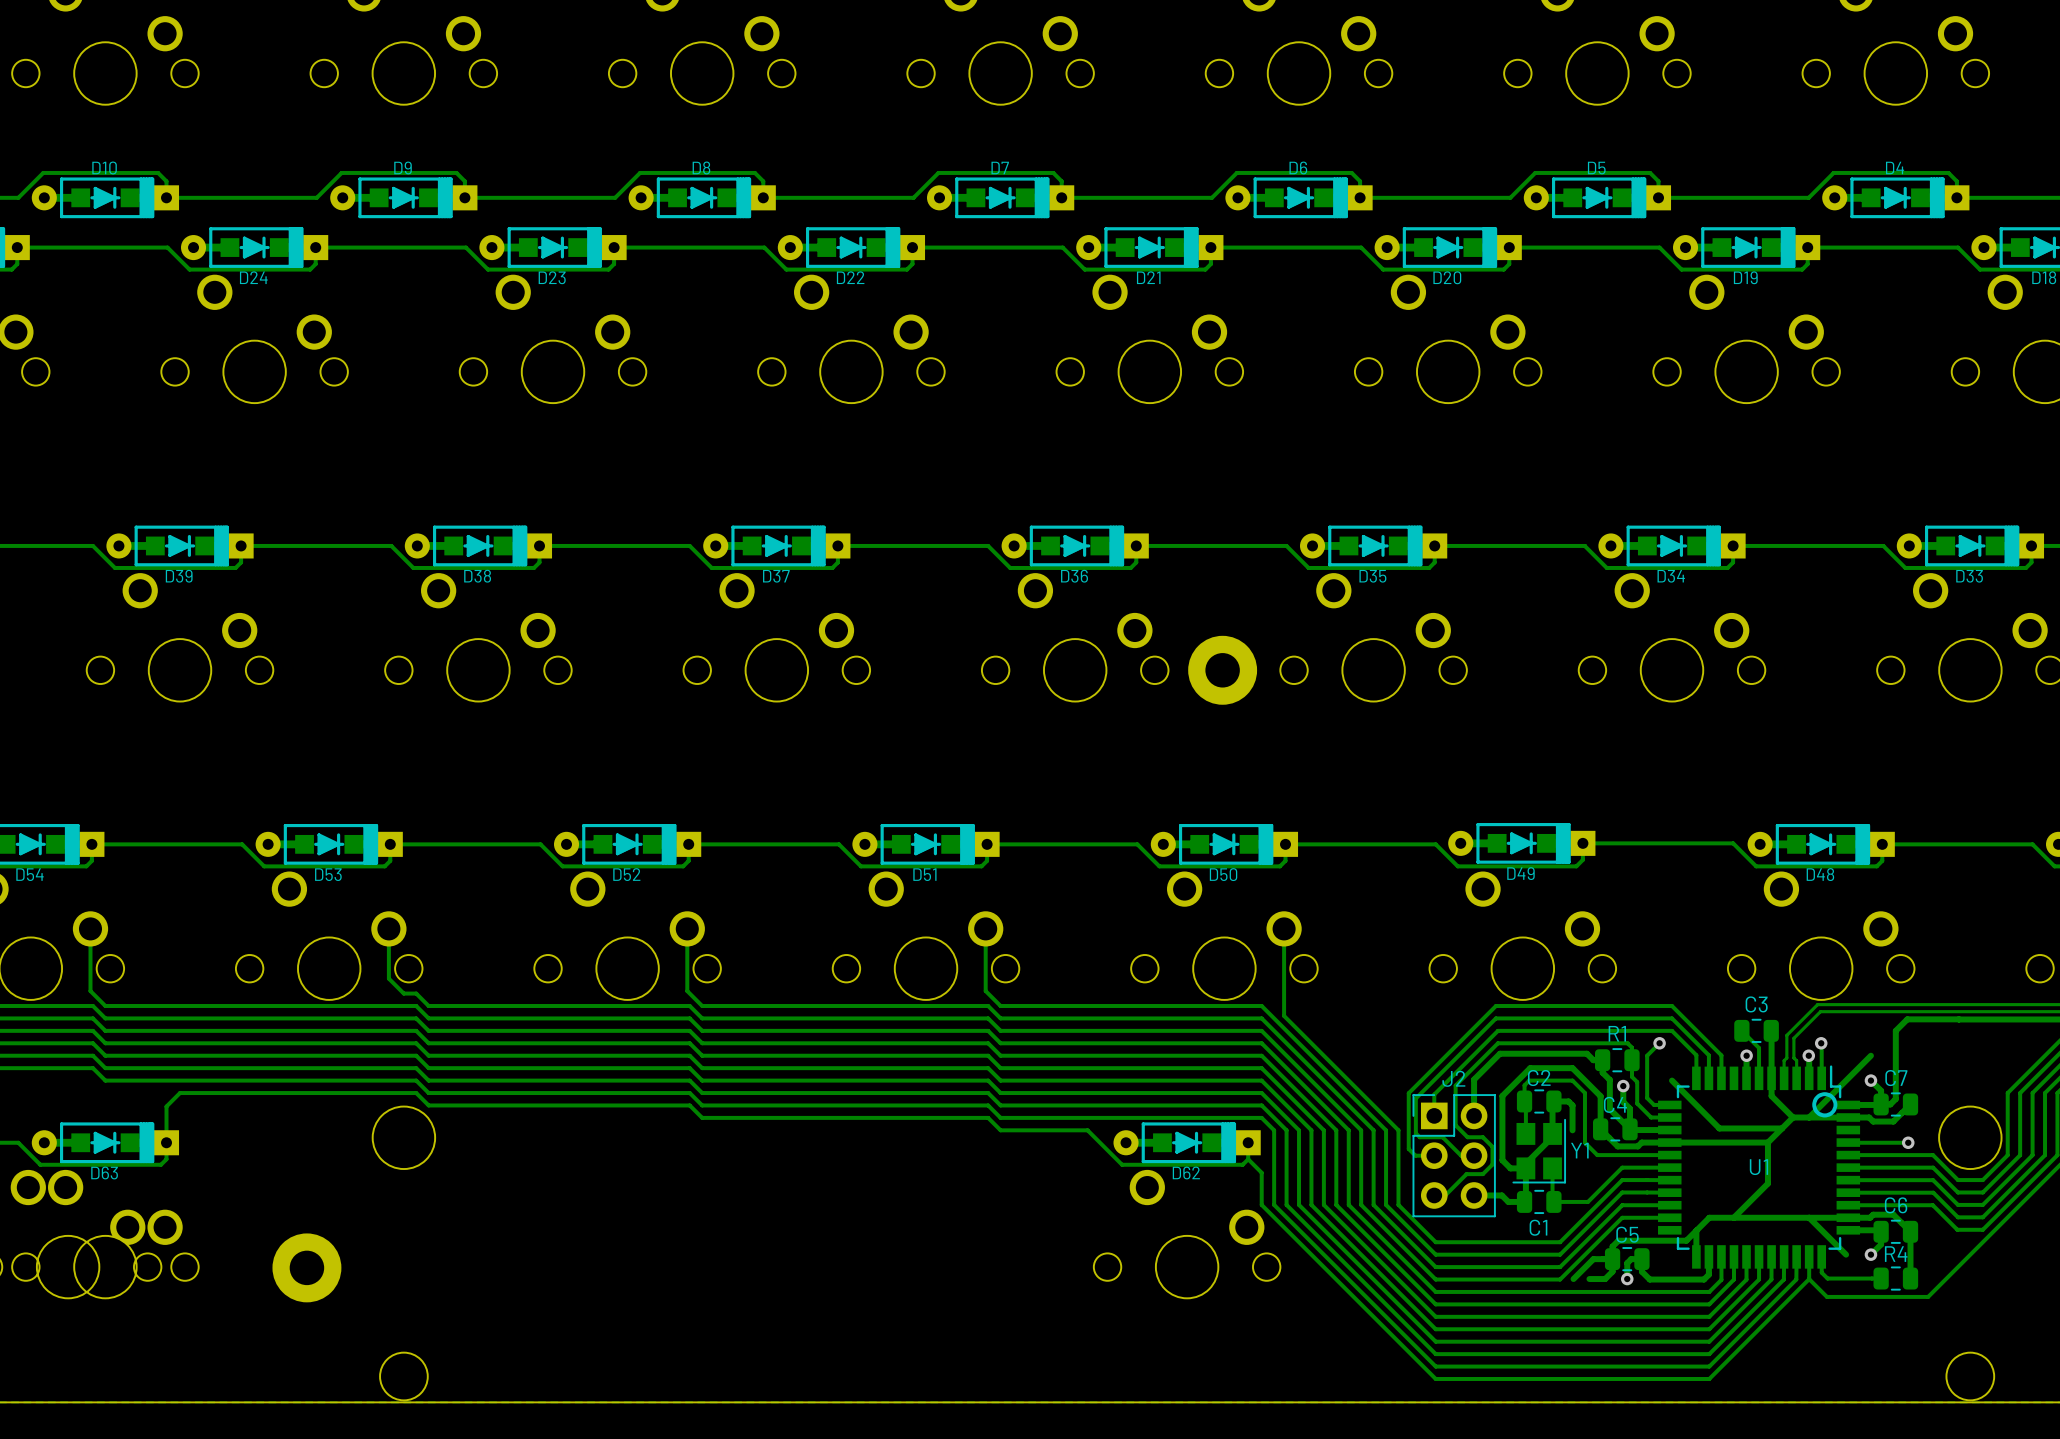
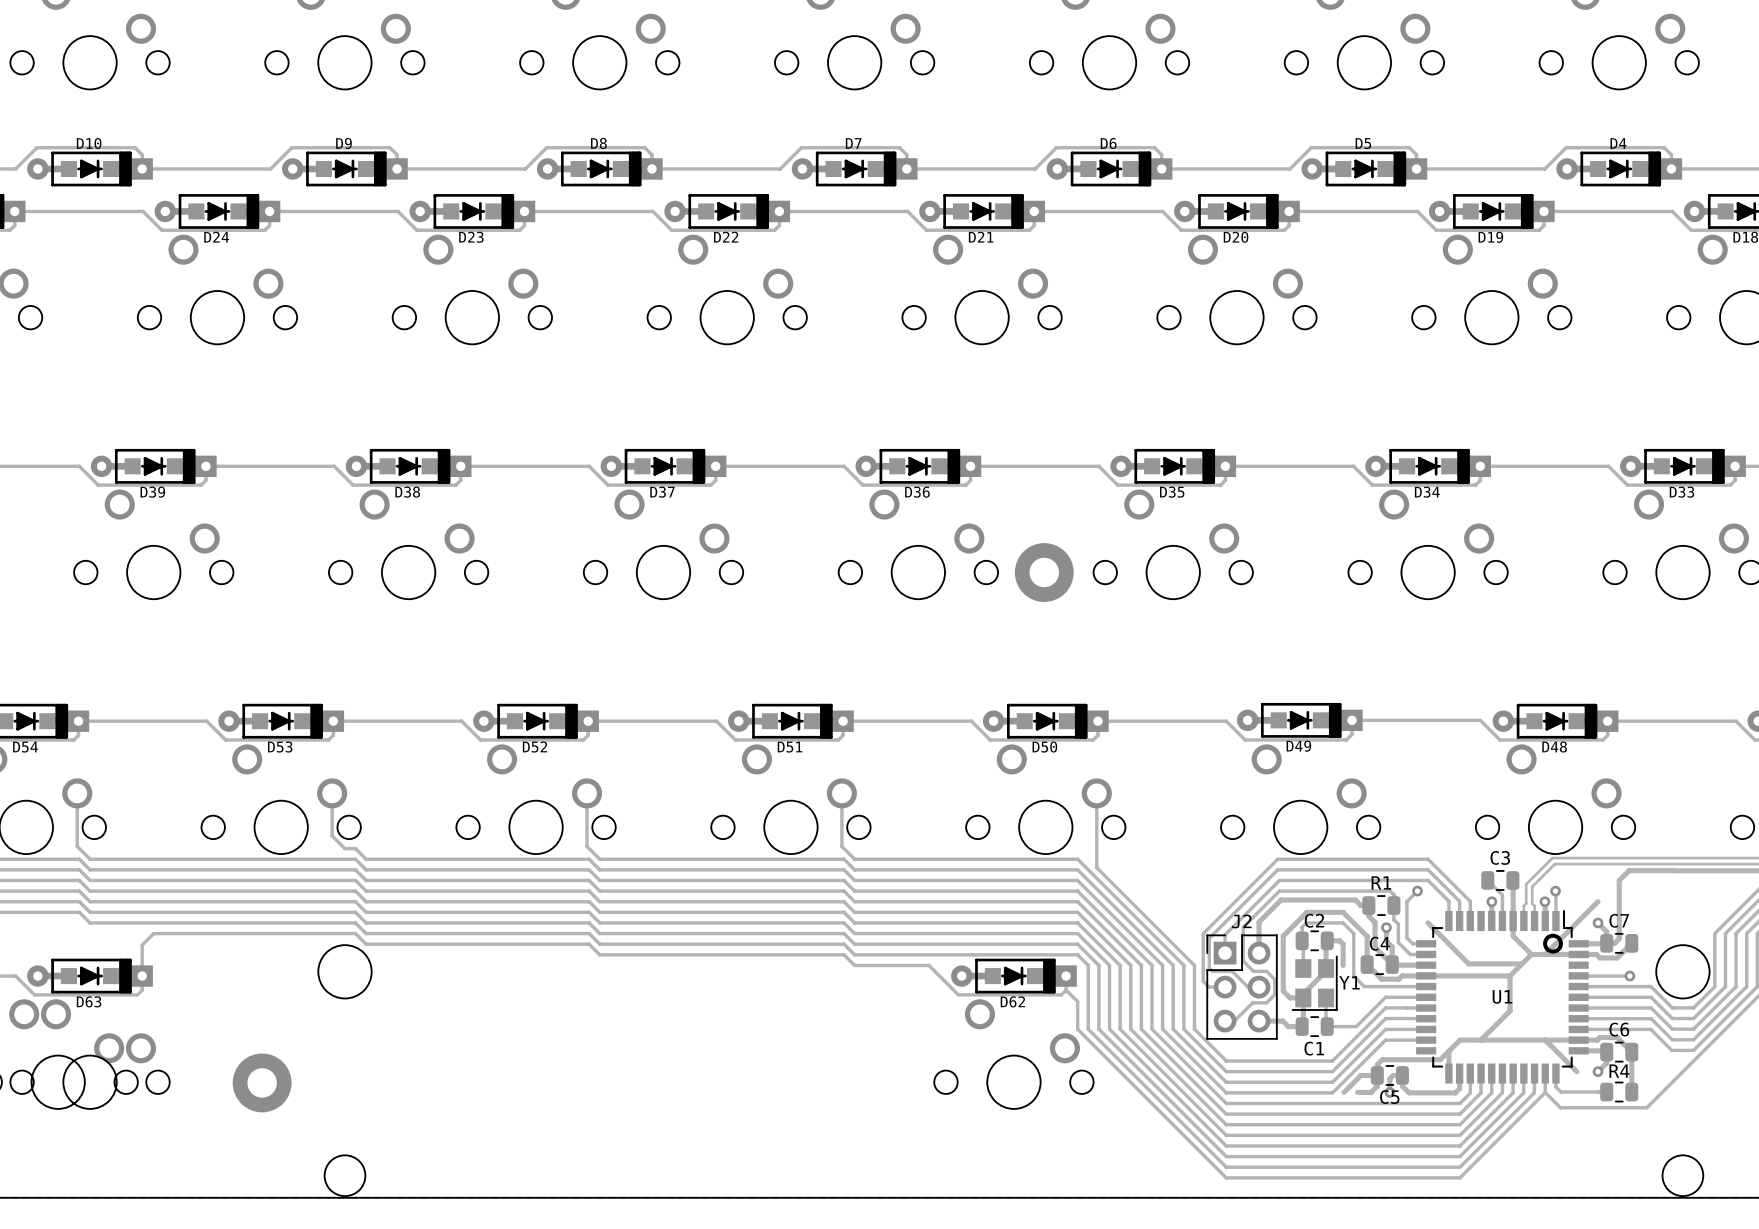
C5 name position: C5 (1627, 1234) -> C5 (1389, 1097)

